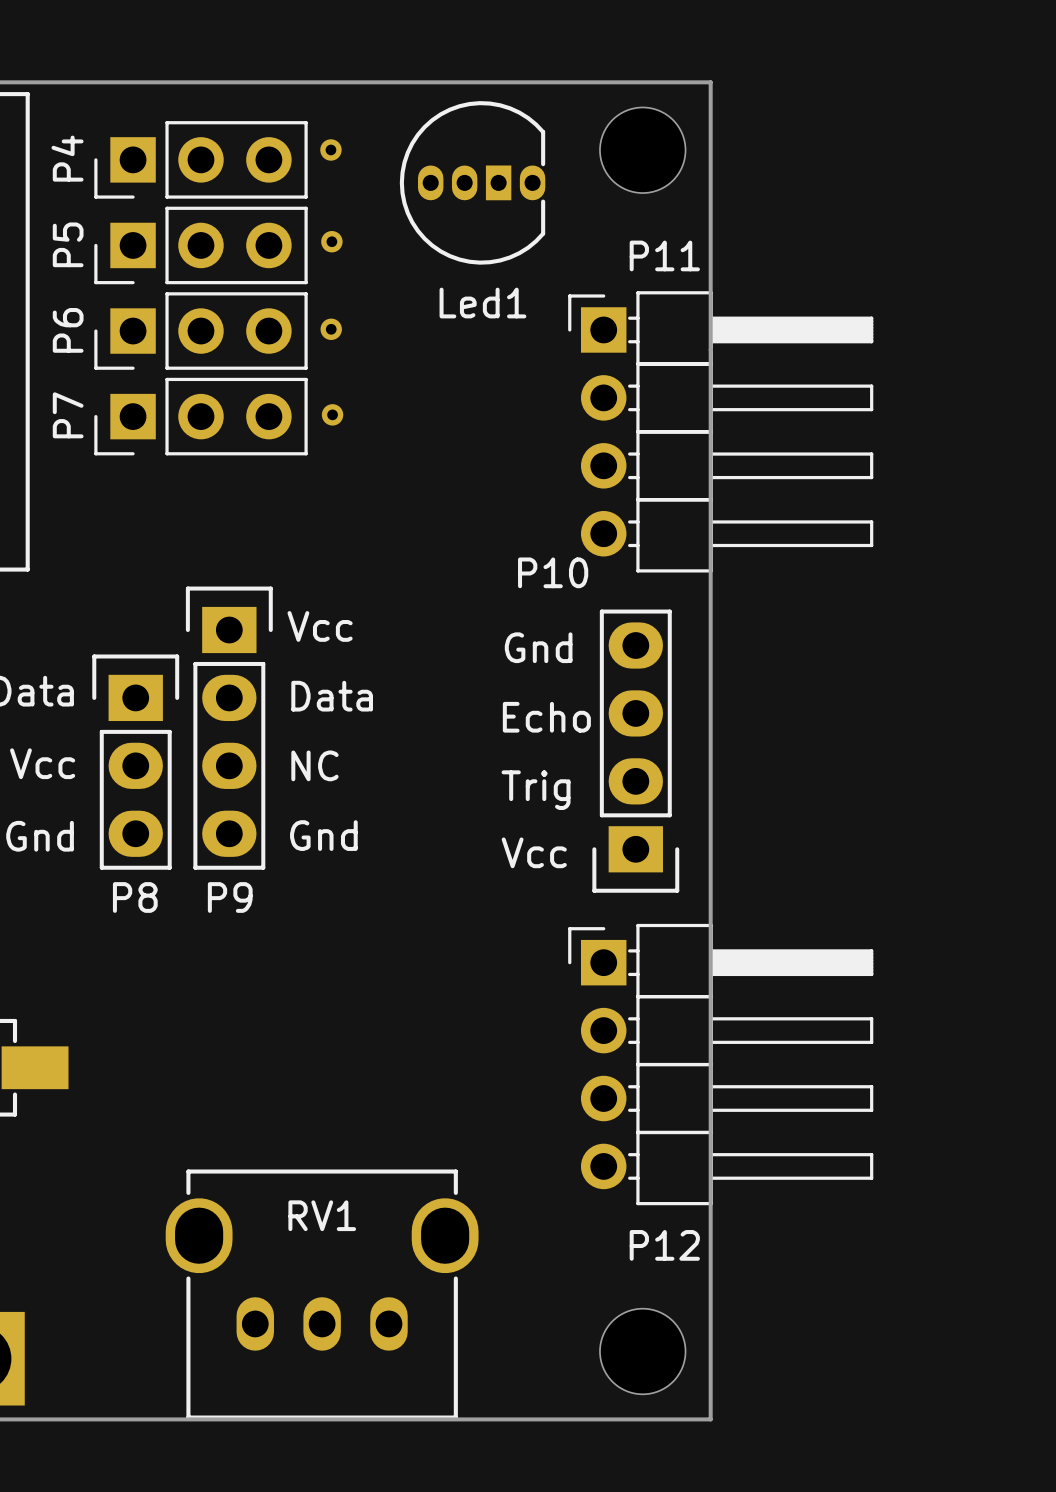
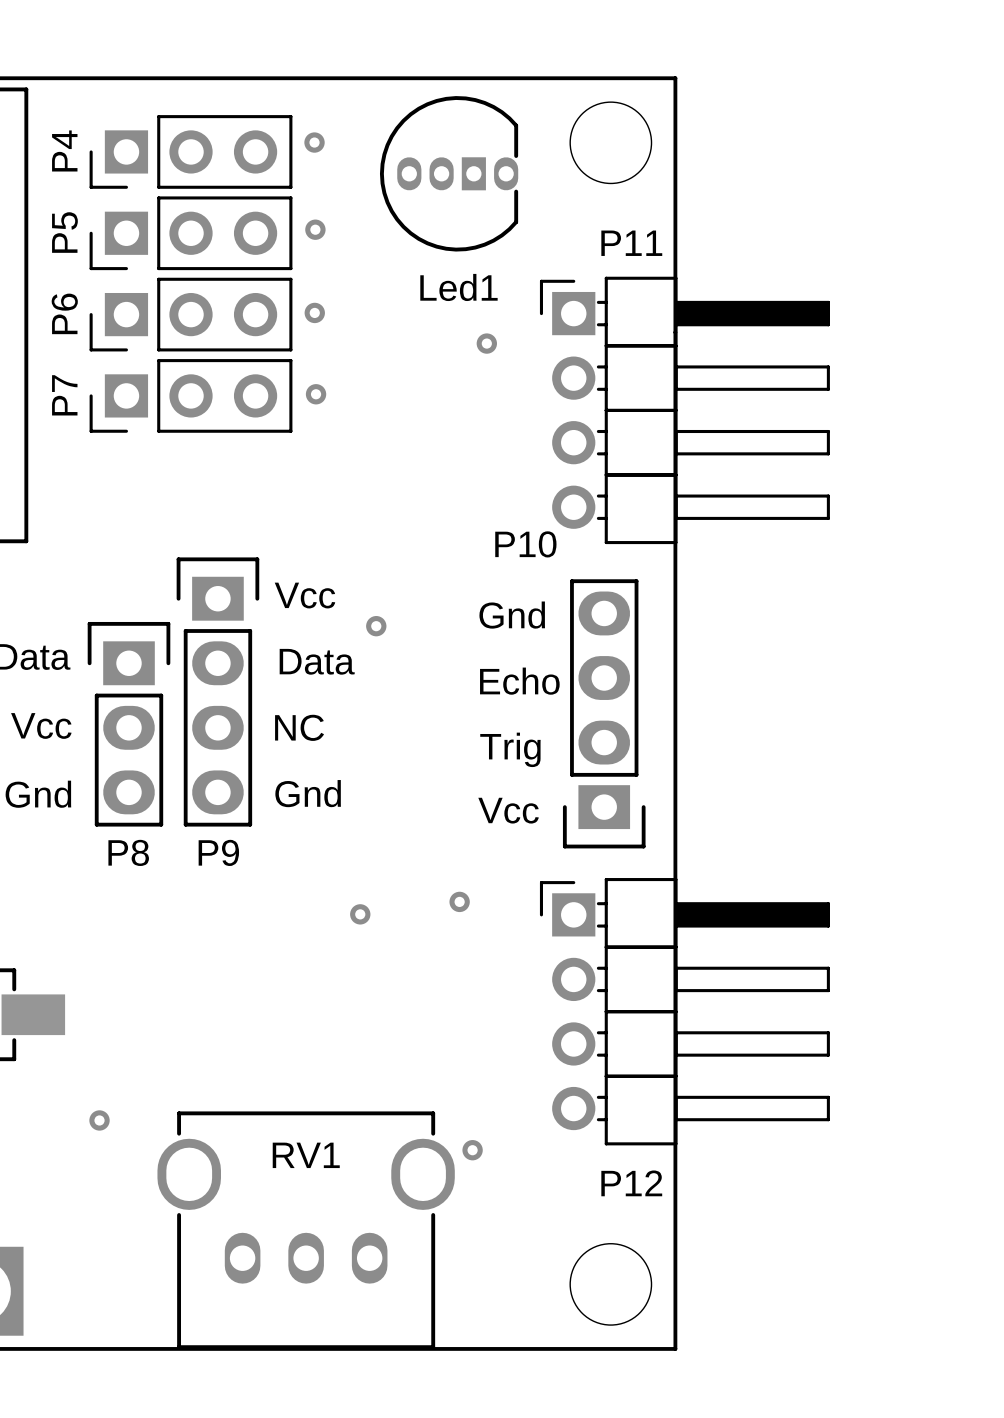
part: none -> (486, 343)
part: none -> (376, 626)
part: none -> (459, 901)
part: none -> (360, 914)
part: none -> (99, 1120)
part: none -> (472, 1150)

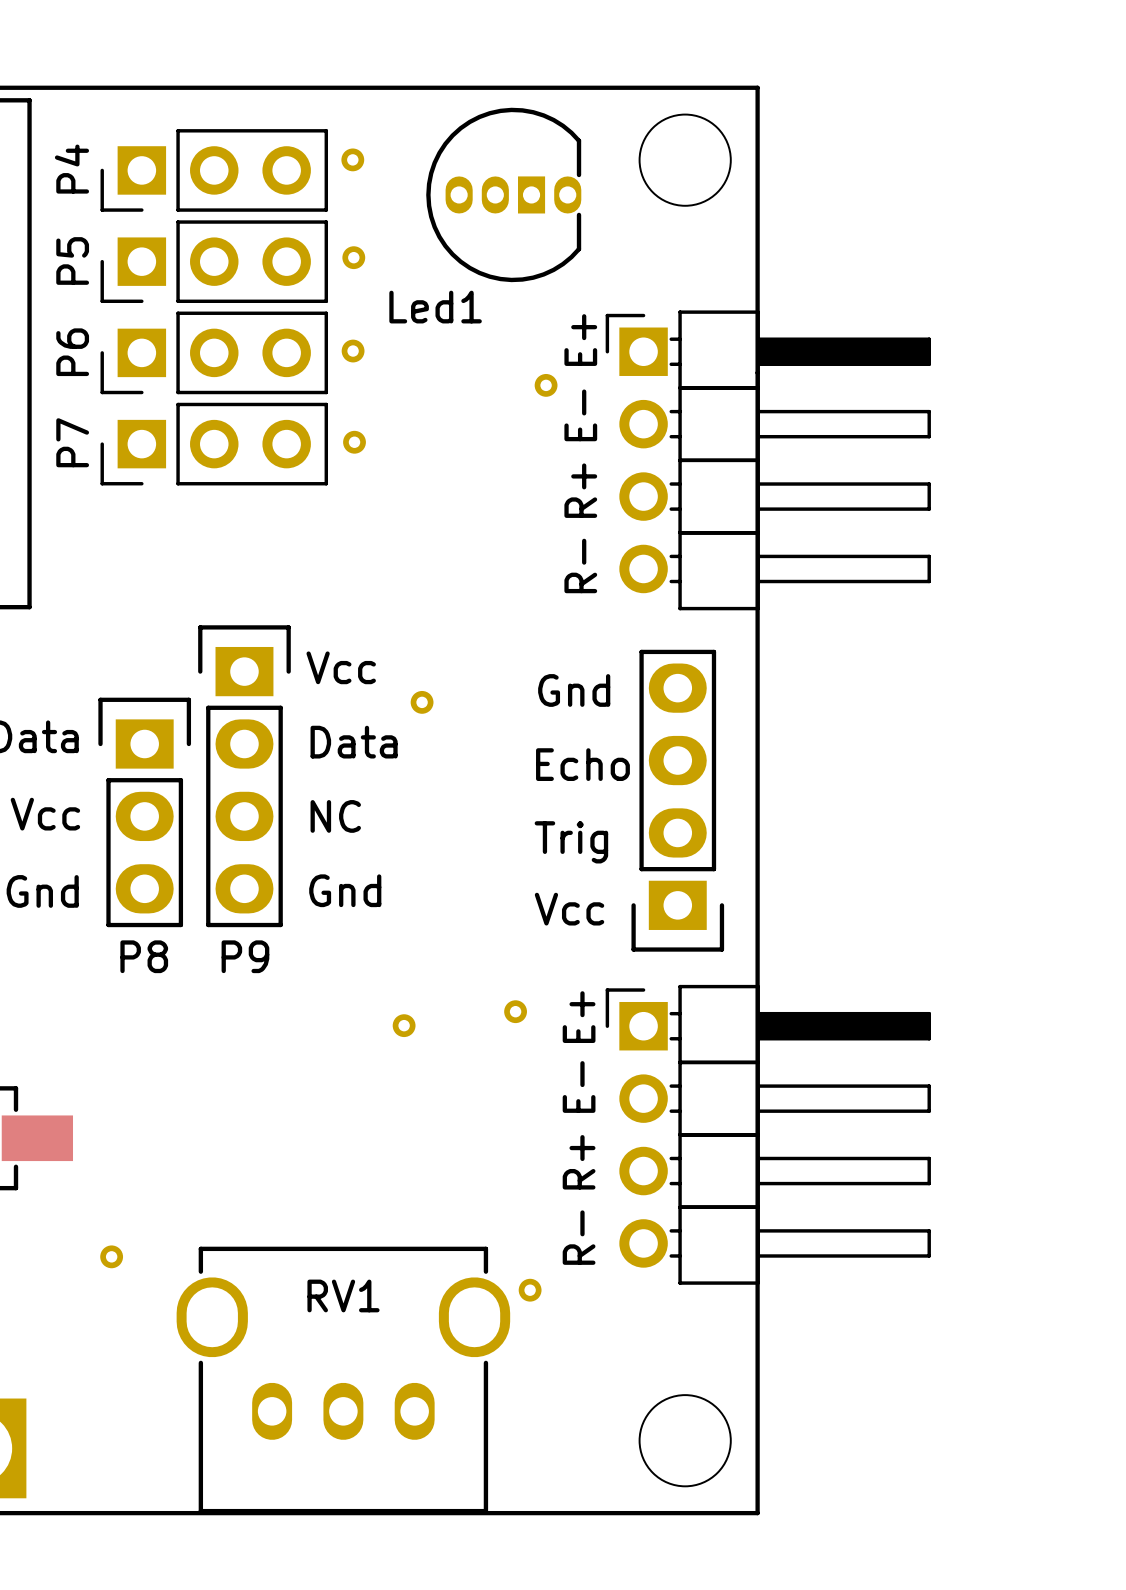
P11 name: P11 (631, 243) -> none
Led1 name position: Led1 (458, 287) -> Led1 (435, 307)
text: none -> E+ (580, 340)
text: none -> E- (580, 415)
text: none -> R+ (580, 490)
text: none -> R- (580, 565)
P10 name: P10 (525, 544) -> none
text: none -> E+ (579, 1017)
text: none -> E- (579, 1086)
text: none -> R+ (579, 1162)
text: none -> R- (579, 1237)
P12 name: P12 (631, 1183) -> none

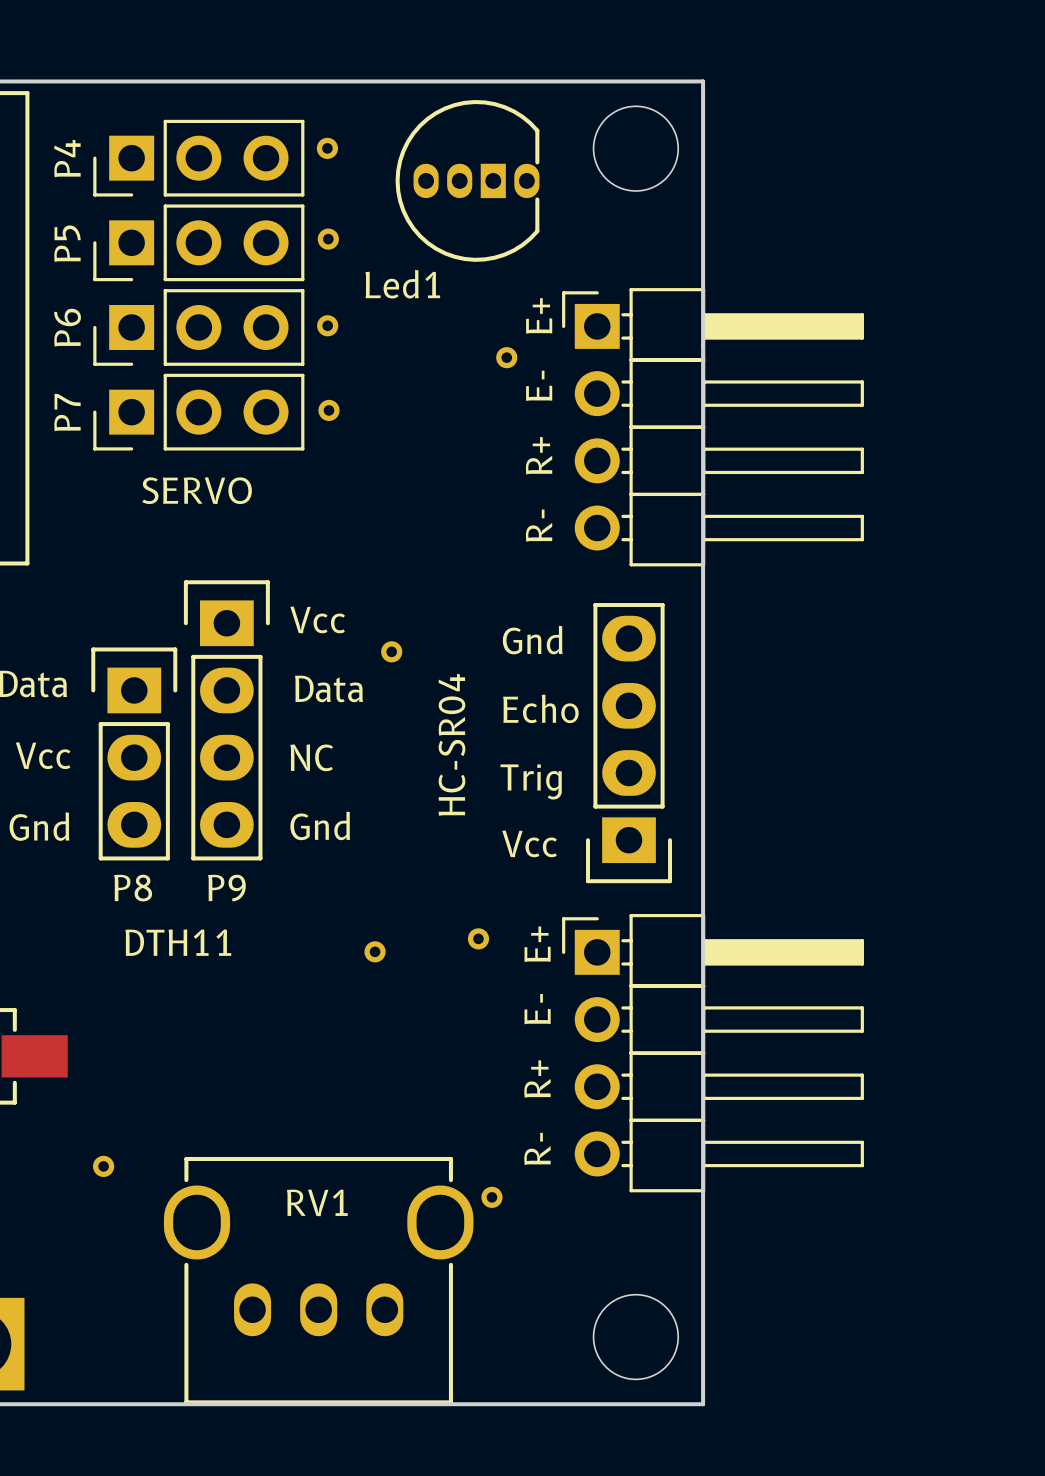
text: none -> SERVO (197, 490)
text: none -> HC-SR04 (451, 744)
text: none -> DTH11 (178, 942)

